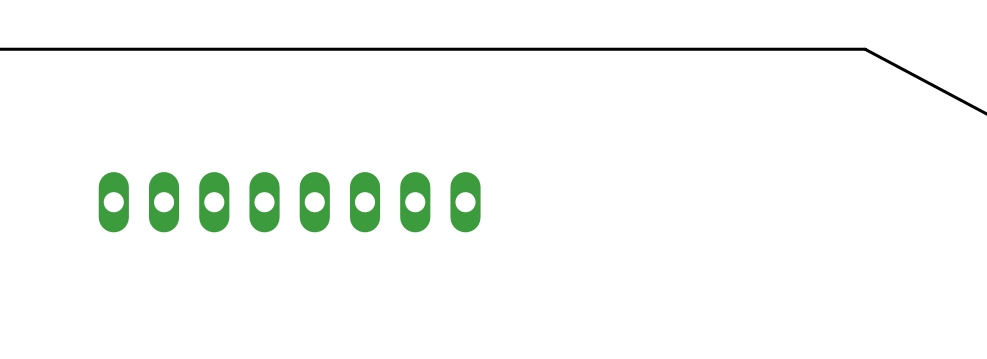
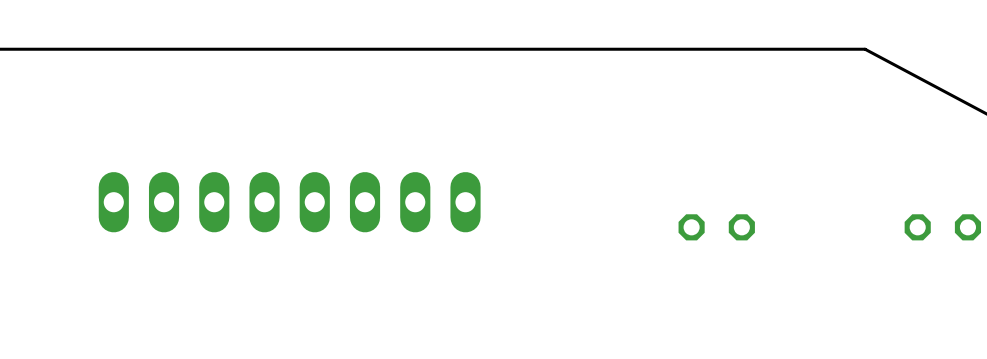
part: none -> (716, 227)
part: none -> (942, 227)

